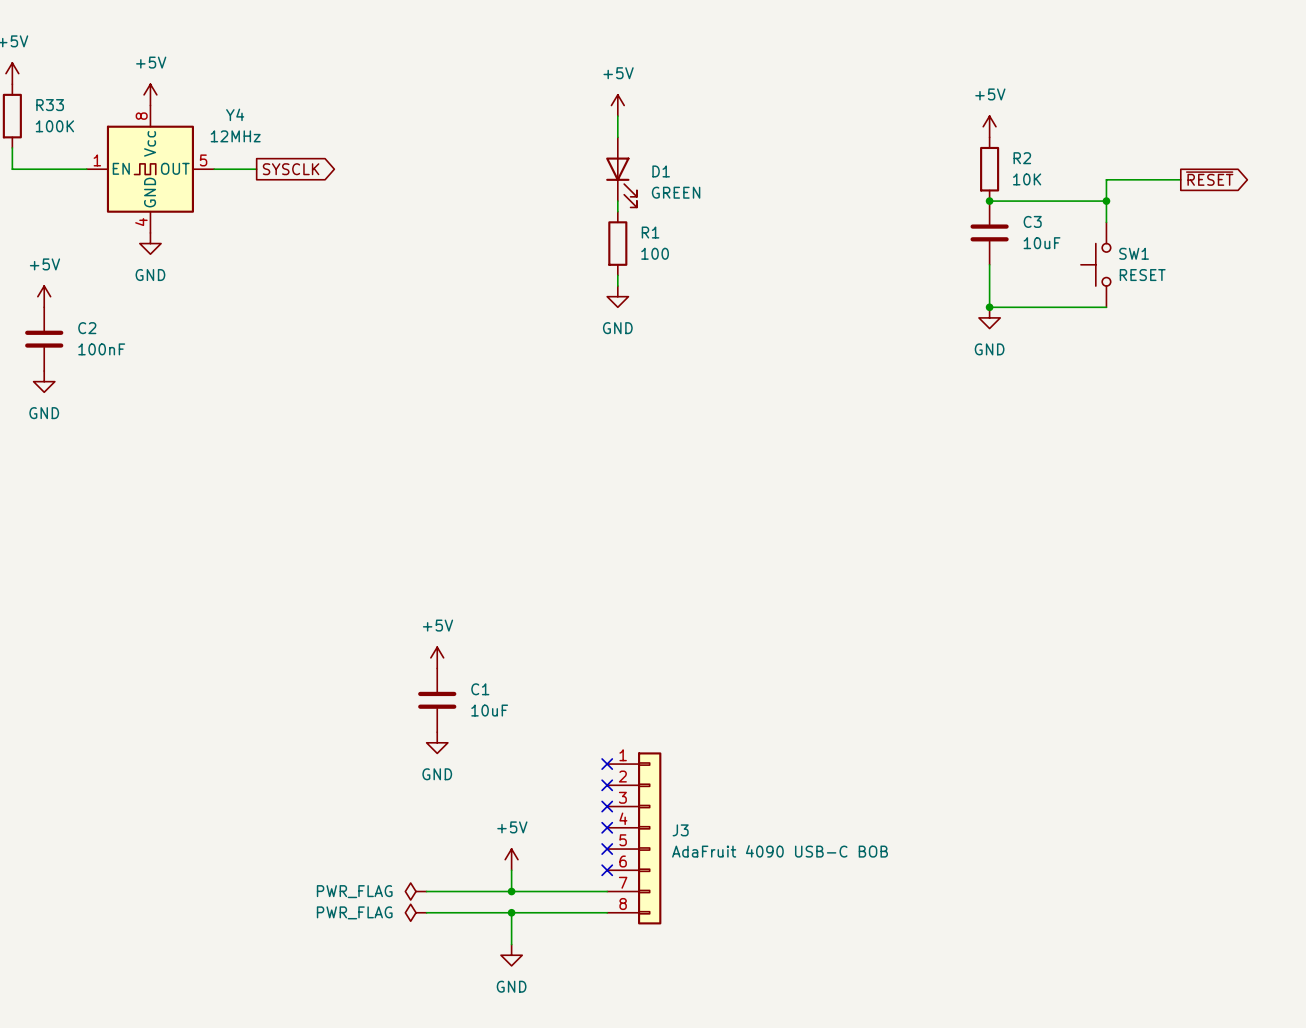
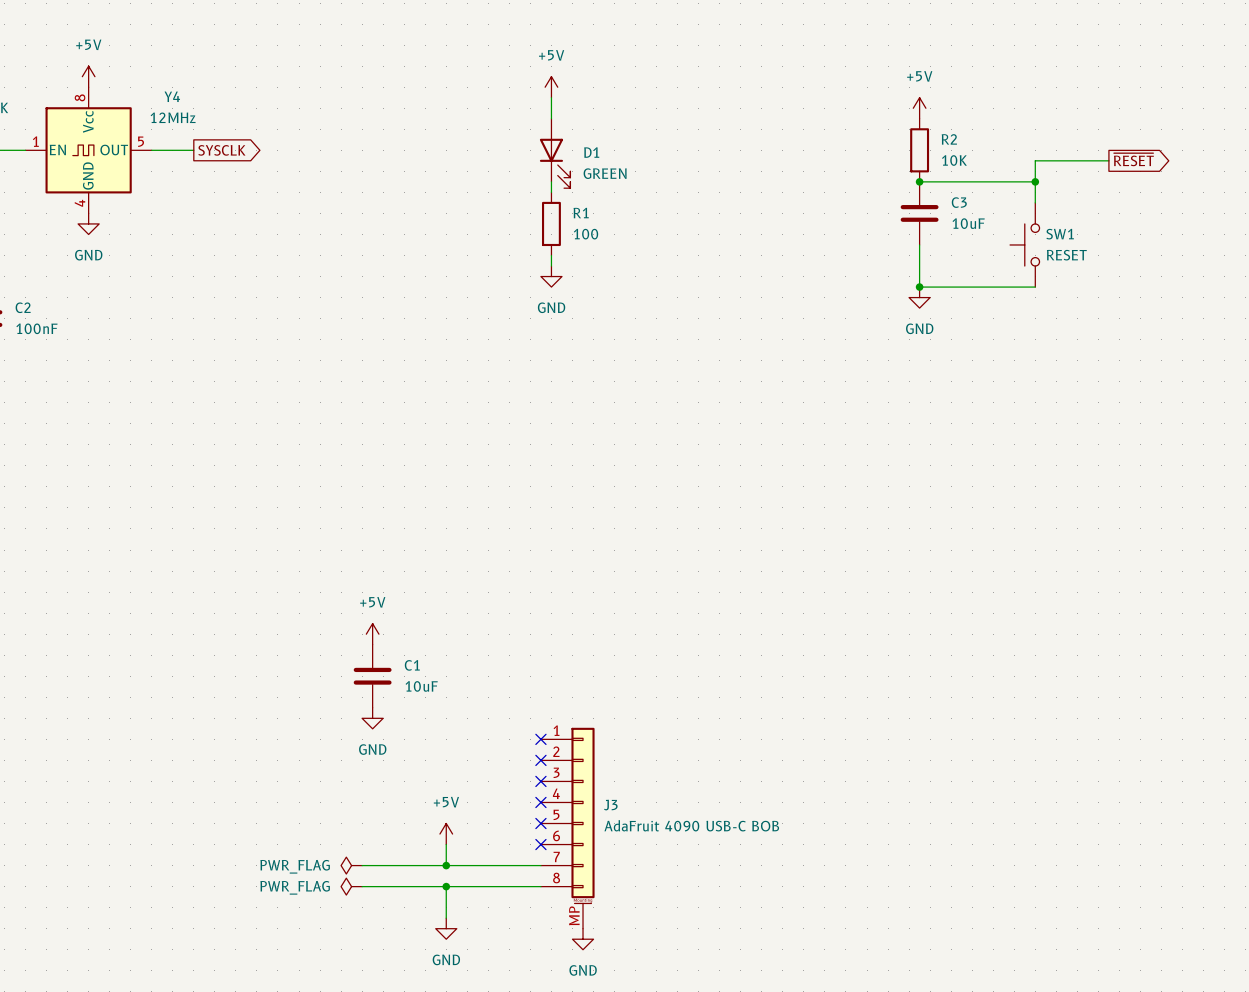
J3 symbol: [607, 752, 662, 925] -> [540, 727, 595, 929]
power symbol: none -> GND (583, 939)

